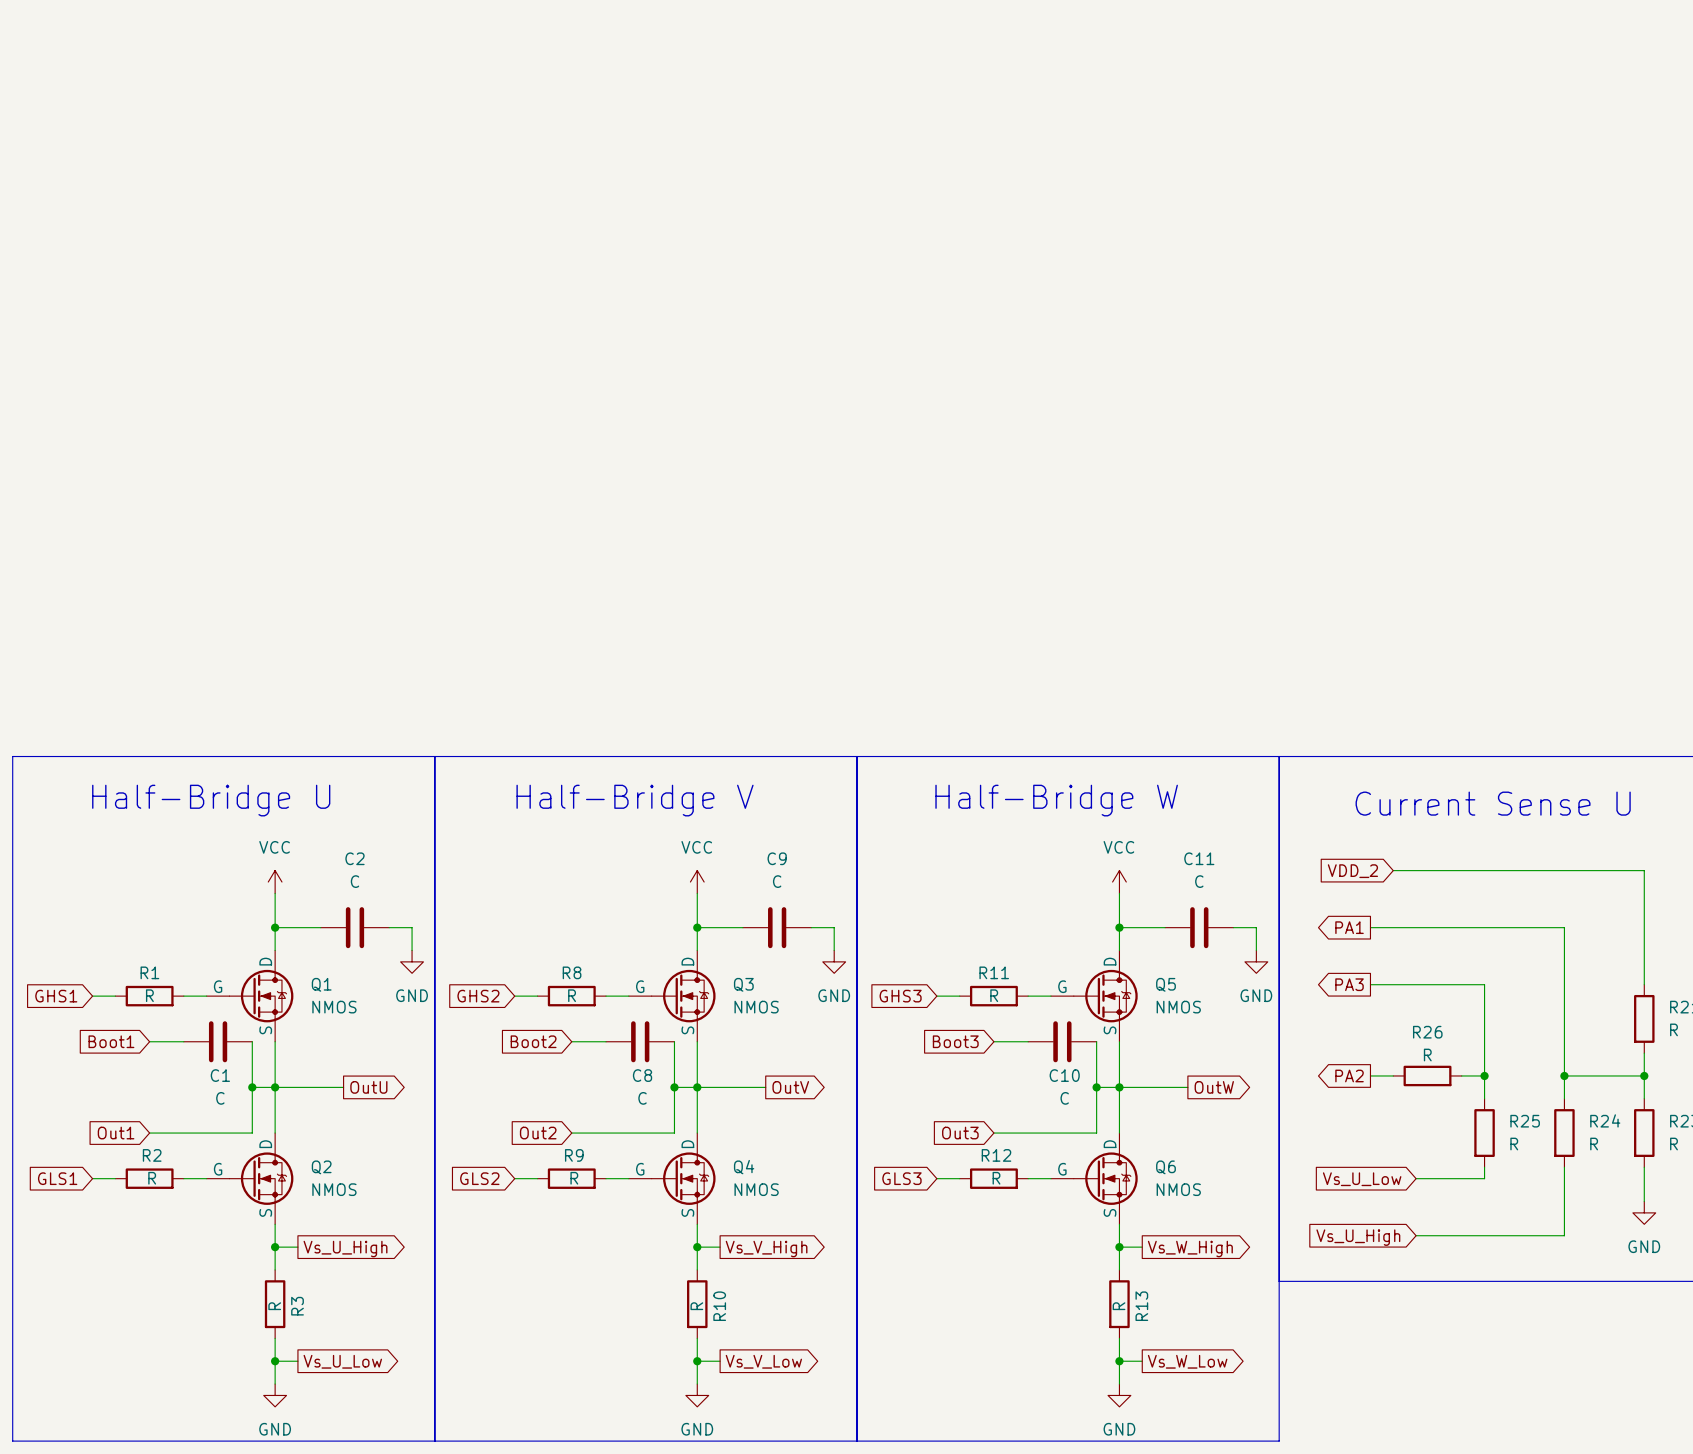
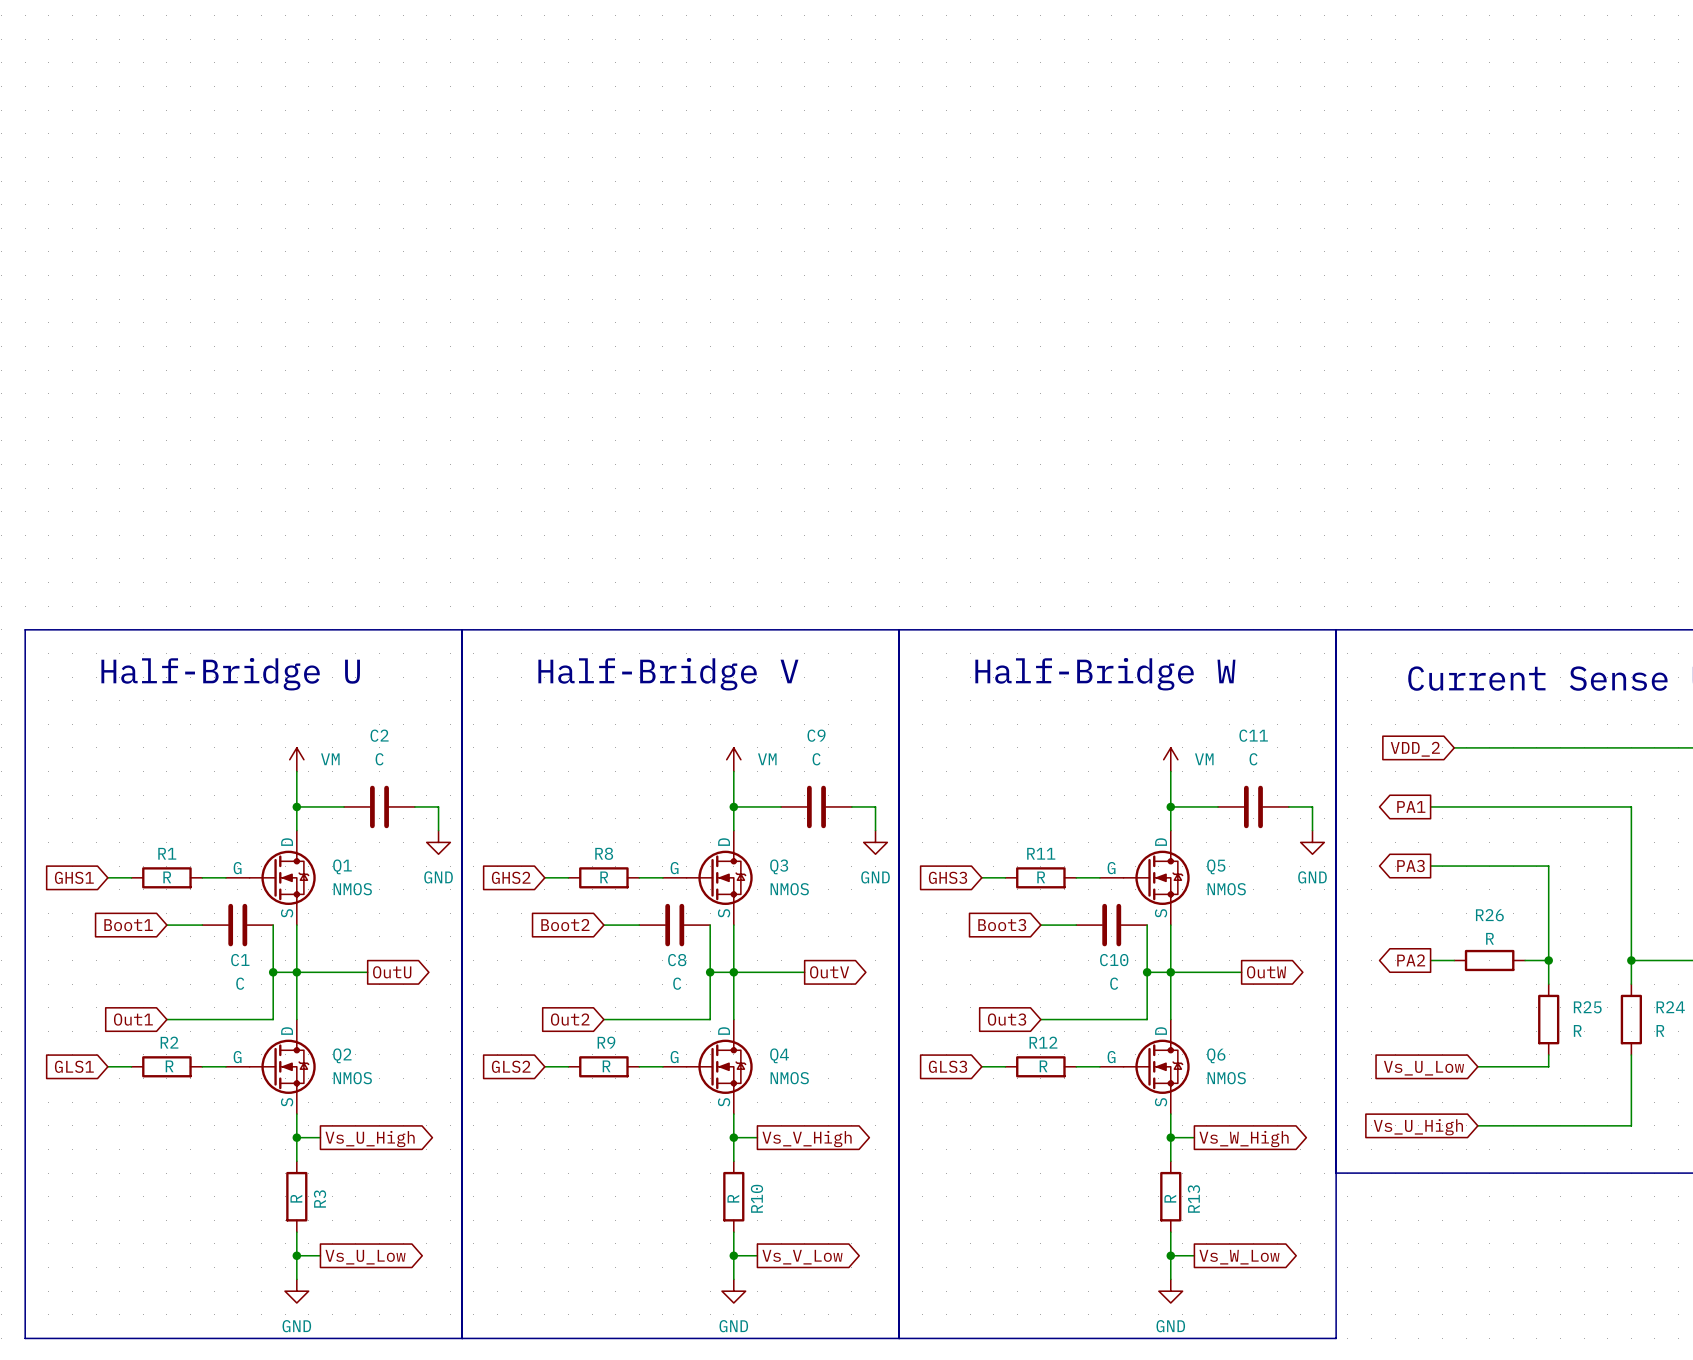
power symbol: VCC (275, 882) -> VM (296, 759)
power symbol: VCC (697, 882) -> VM (733, 759)
power symbol: VCC (1119, 882) -> VM (1170, 759)

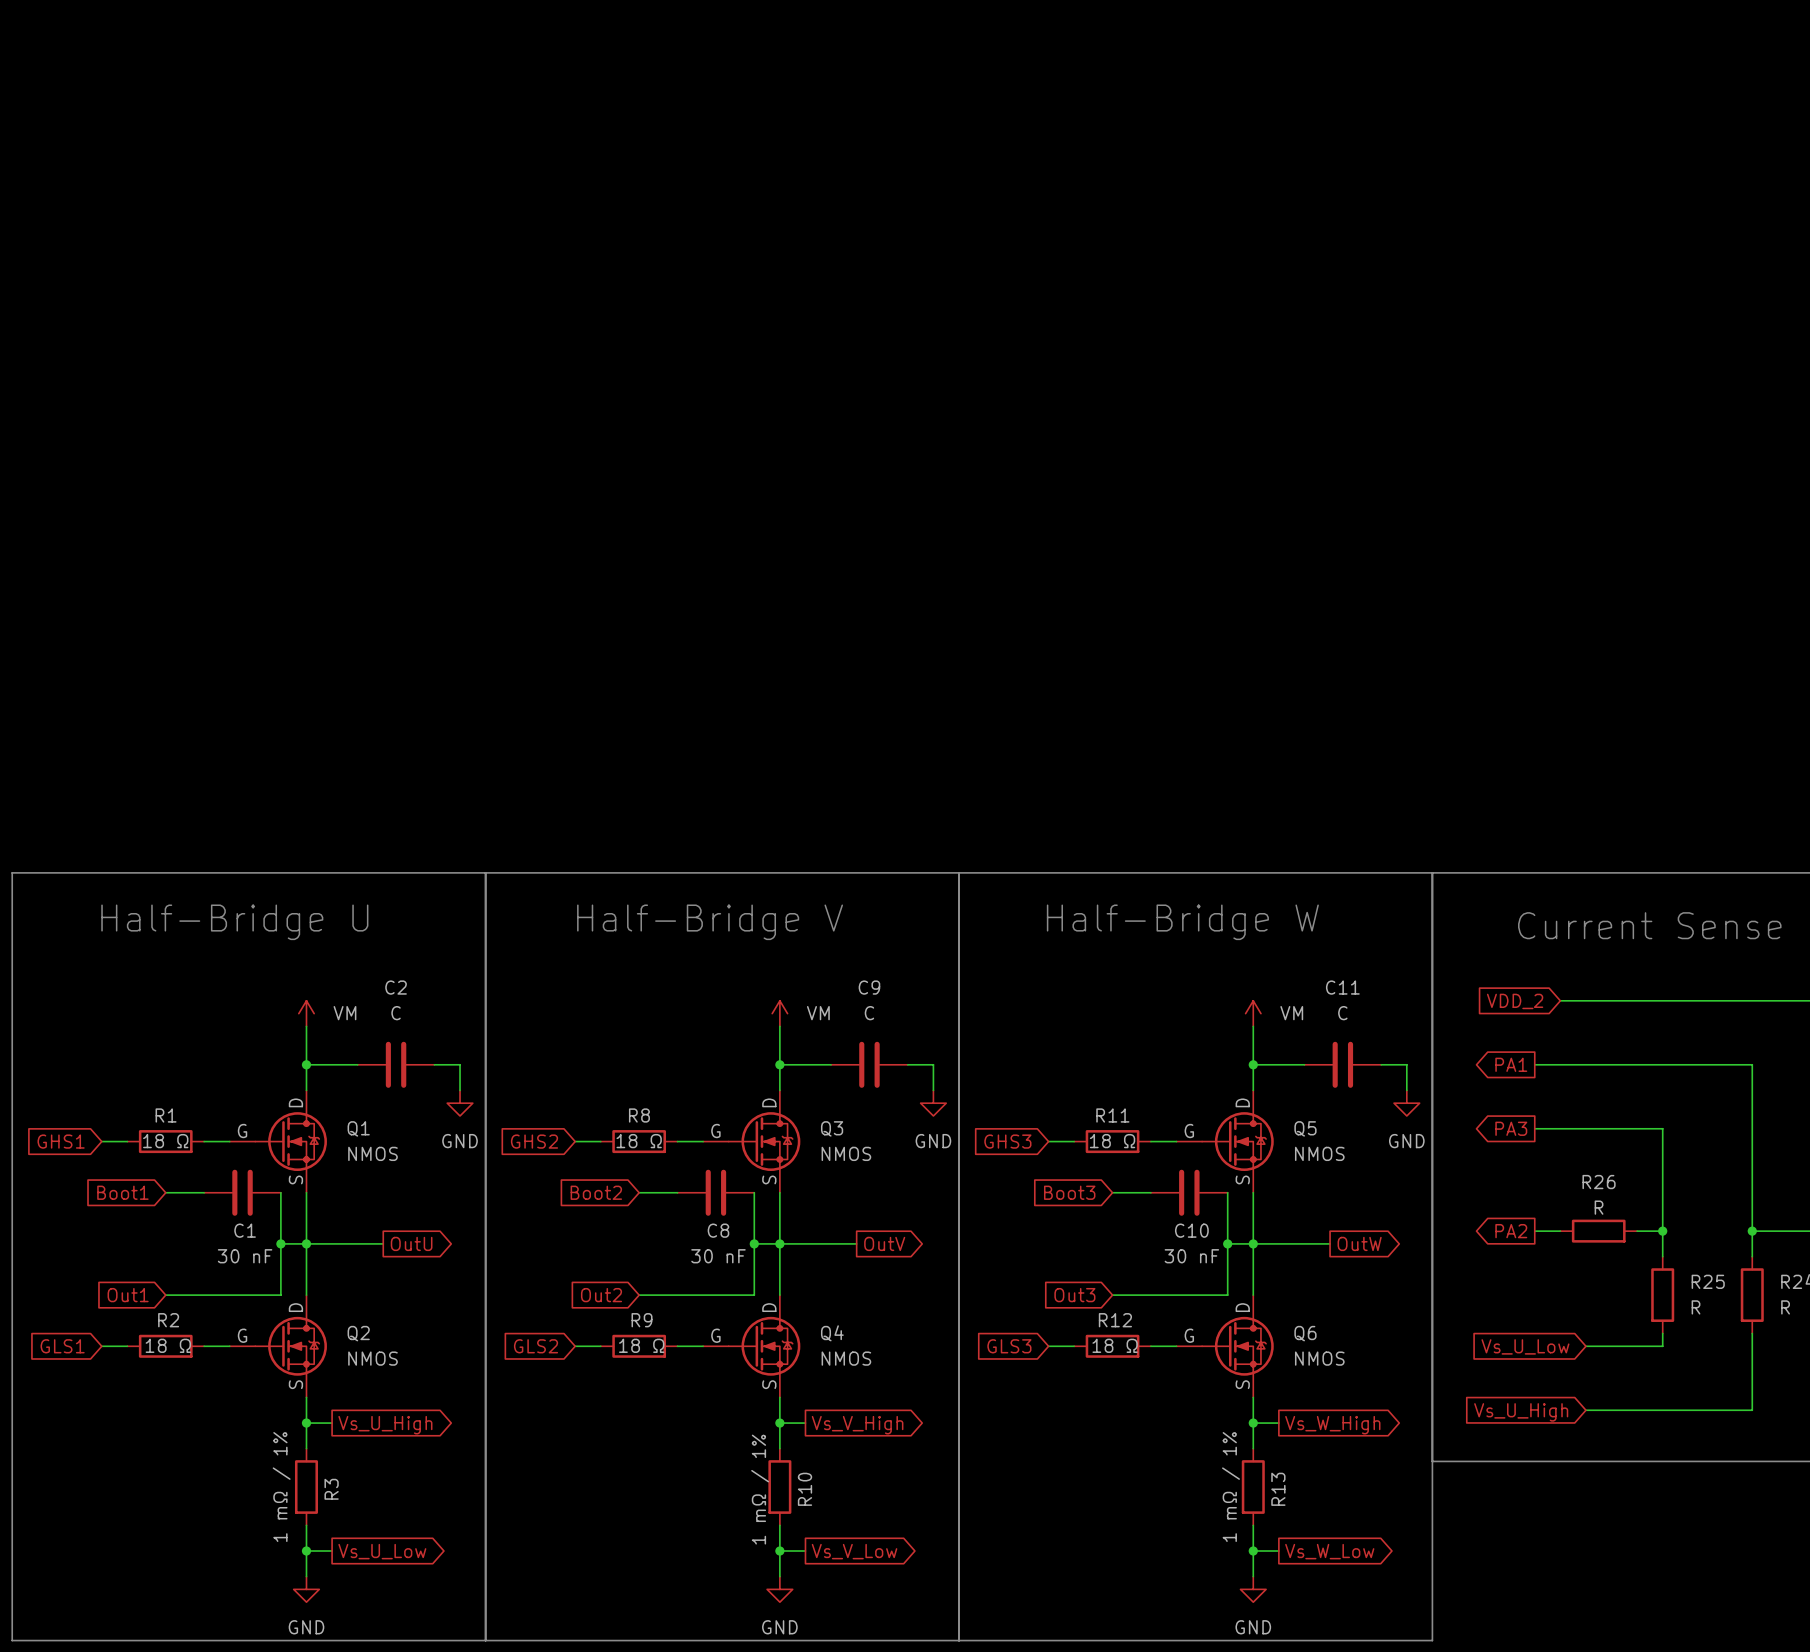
R1 value: R (167, 877) -> 18 Ω (165, 1141)
R8 value: R (604, 877) -> 18 Ω (639, 1141)
R11 value: R (1041, 877) -> 18 Ω (1112, 1141)
C1 value: C (240, 983) -> 30 nF (245, 1256)
C8 value: C (677, 983) -> 30 nF (718, 1256)
C10 value: C (1114, 983) -> 30 nF (1191, 1256)
R2 value: R (169, 1066) -> 18 Ω (168, 1345)
R9 value: R (606, 1066) -> 18 Ω (641, 1345)
R12 value: R (1043, 1066) -> 18 Ω (1115, 1345)
R3 value: R (296, 1198) -> 1 mΩ / 1% (281, 1487)
R10 value: R (733, 1198) -> 1 mΩ / 1% (760, 1489)
R13 value: R (1170, 1198) -> 1 mΩ / 1% (1230, 1487)

